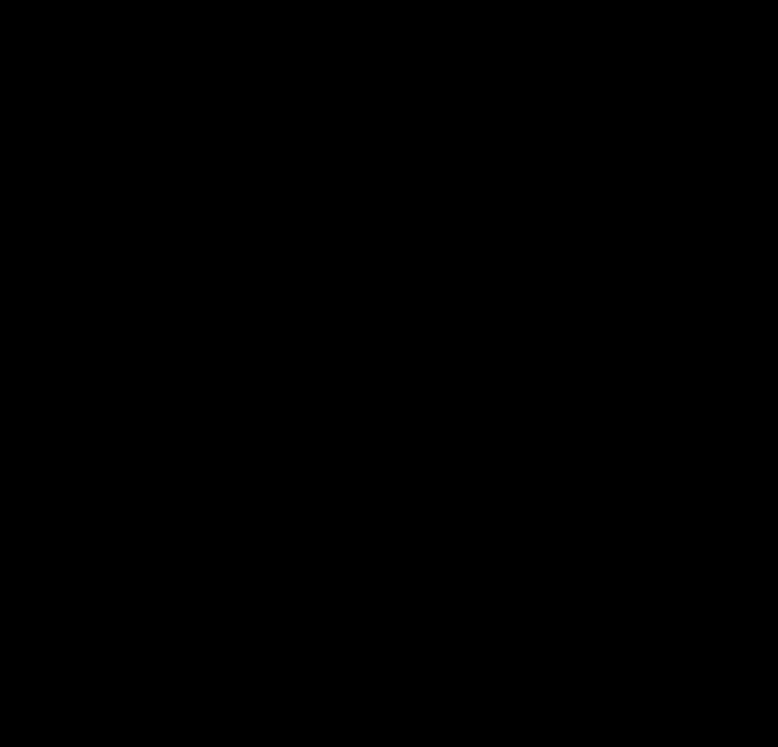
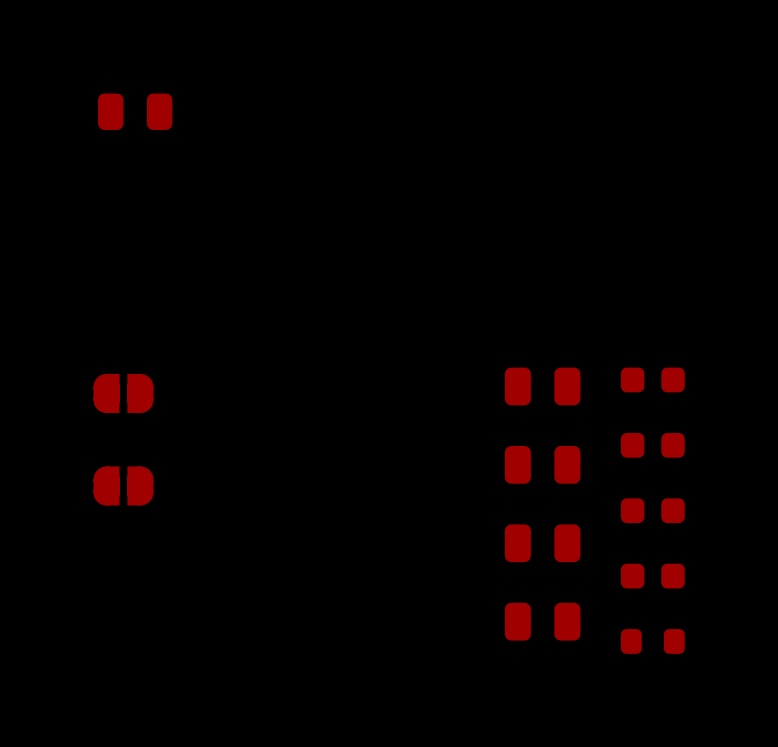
part: none -> (135, 111)
part: none -> (652, 379)
part: none -> (542, 386)
part: none -> (123, 393)
part: none -> (652, 445)
part: none -> (542, 464)
part: none -> (123, 485)
part: none -> (652, 510)
part: none -> (542, 543)
part: none -> (652, 576)
part: none -> (542, 621)
part: none -> (652, 641)

